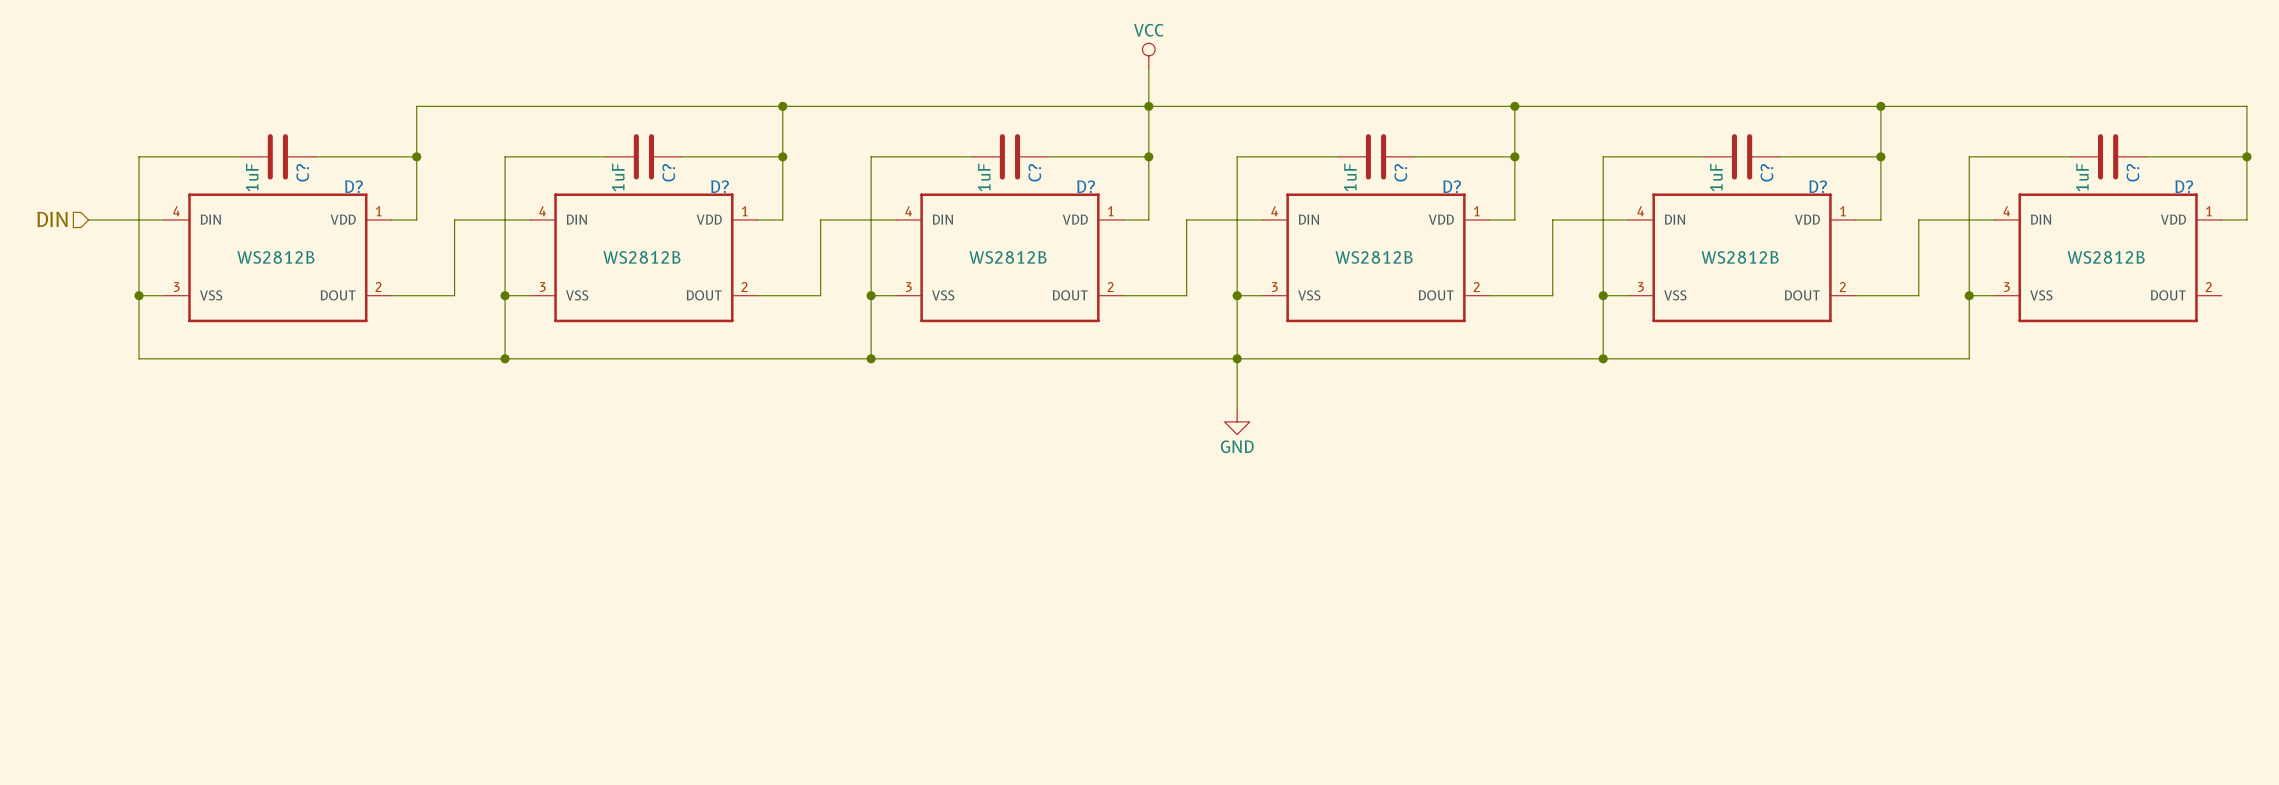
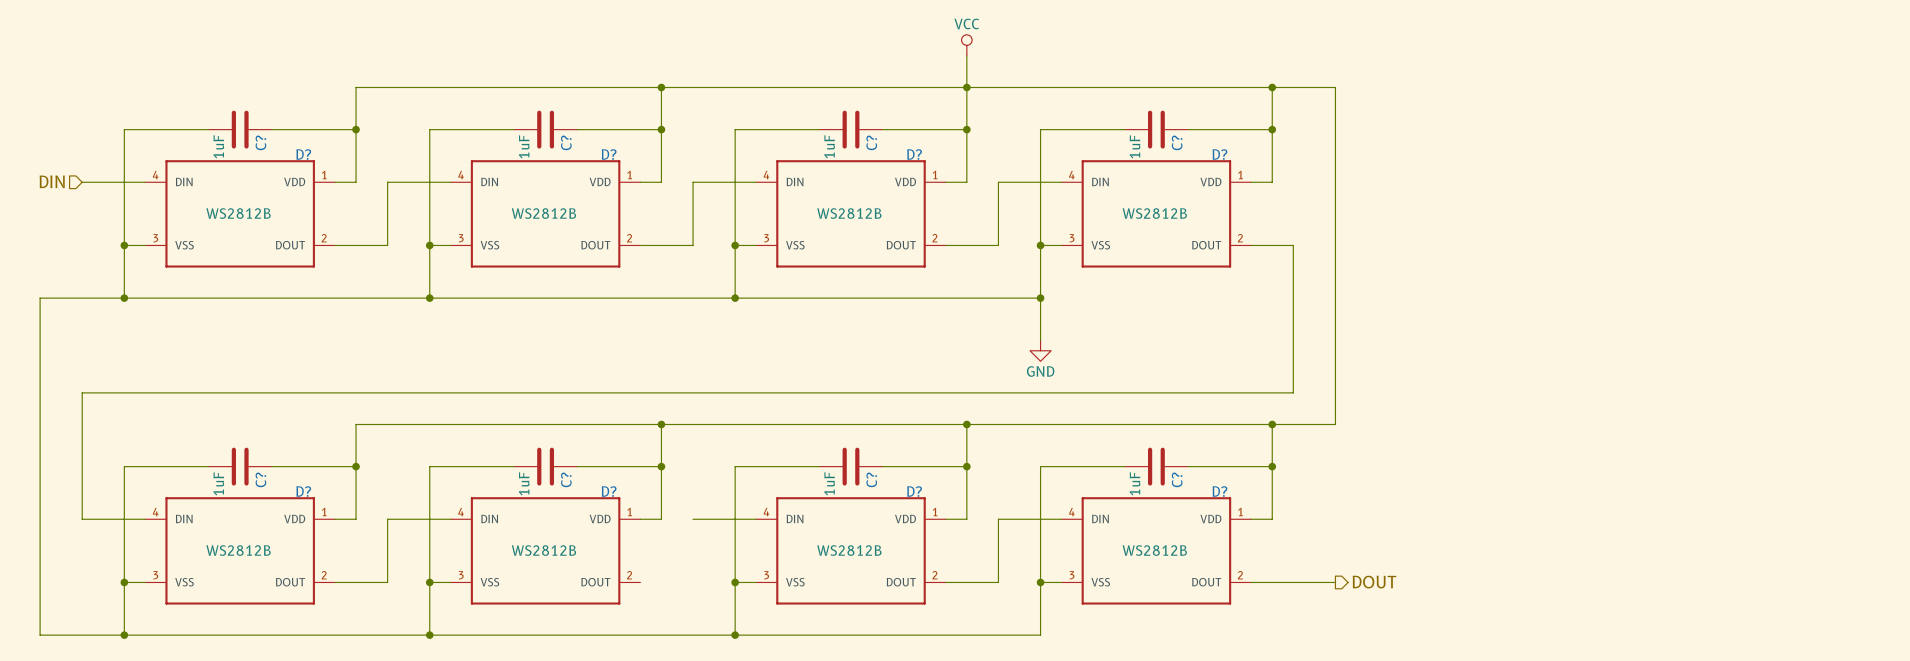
wire: (1590, 106) (2246, 106) (2246, 219) (2221, 219) -> (1335, 87) (1335, 424) (356, 424) (356, 519) (334, 519)
wire: (1880, 106) (1880, 219) (1855, 219) -> none
junction: (1880, 106) -> none
wire: (1704, 156) (1603, 156) (1603, 358) -> none
C?: 1uF (1742, 156) -> none
wire: (1779, 156) (1880, 156) -> none
junction: (1880, 156) -> none
wire: (2070, 156) (1969, 156) (1969, 358) (1237, 358) -> none
C?: 1uF (2108, 156) -> none
wire: (2145, 156) (2246, 156) -> none
junction: (2246, 156) -> none
wire: (1628, 219) (1552, 219) (1552, 295) (1540, 295) -> (145, 519) (82, 519) (82, 392) (1293, 392) (1293, 245)
wire: (1994, 219) (1918, 219) (1918, 295) (1855, 295) -> none
D?: WS2812B (1742, 257) -> none
D?: WS2812B (2108, 257) -> none
wire: (1603, 295) (1628, 295) -> none
junction: (1603, 295) -> none
wire: (1969, 295) (1994, 295) -> none
junction: (1969, 295) -> none
wire: none -> (124, 298) (40, 298) (40, 635) (1040, 635) (1040, 466) (1124, 466)
junction: none -> (124, 298)
junction: (1603, 358) -> none
wire: none -> (661, 424) (661, 519) (640, 519)
junction: none -> (661, 424)
wire: none -> (966, 424) (966, 519) (945, 519)
junction: none -> (966, 424)
wire: none -> (1272, 424) (1272, 519) (1251, 519)
junction: none -> (1272, 424)
wire: none -> (208, 466) (124, 466) (124, 635)
C?: none -> 1uF (240, 466)
wire: none -> (271, 466) (356, 466)
junction: none -> (356, 466)
wire: none -> (514, 466) (429, 466) (429, 635)
C?: none -> 1uF (545, 466)
wire: none -> (577, 466) (661, 466)
junction: none -> (661, 466)
wire: none -> (819, 466) (735, 466) (735, 635)
C?: none -> 1uF (851, 466)
wire: none -> (882, 466) (966, 466)
junction: none -> (966, 466)
C?: none -> 1uF (1156, 466)
wire: none -> (1188, 466) (1272, 466)
junction: none -> (1272, 466)
wire: none -> (450, 519) (387, 519) (387, 582) (334, 582)
wire: none -> (693, 519) (756, 519)
wire: none -> (1061, 519) (998, 519) (998, 582) (945, 582)
D?: none -> WS2812B (240, 550)
D?: none -> WS2812B (545, 550)
D?: none -> WS2812B (851, 550)
D?: none -> WS2812B (1156, 550)
wire: none -> (124, 582) (145, 582)
junction: none -> (124, 582)
wire: none -> (429, 582) (450, 582)
junction: none -> (429, 582)
wire: none -> (735, 582) (756, 582)
junction: none -> (735, 582)
wire: none -> (1040, 582) (1061, 582)
junction: none -> (1040, 582)
wire: none -> (1251, 582) (1335, 582)
hierarchical label: none -> DOUT (1374, 582)
junction: none -> (124, 635)
junction: none -> (429, 635)
junction: none -> (735, 635)

